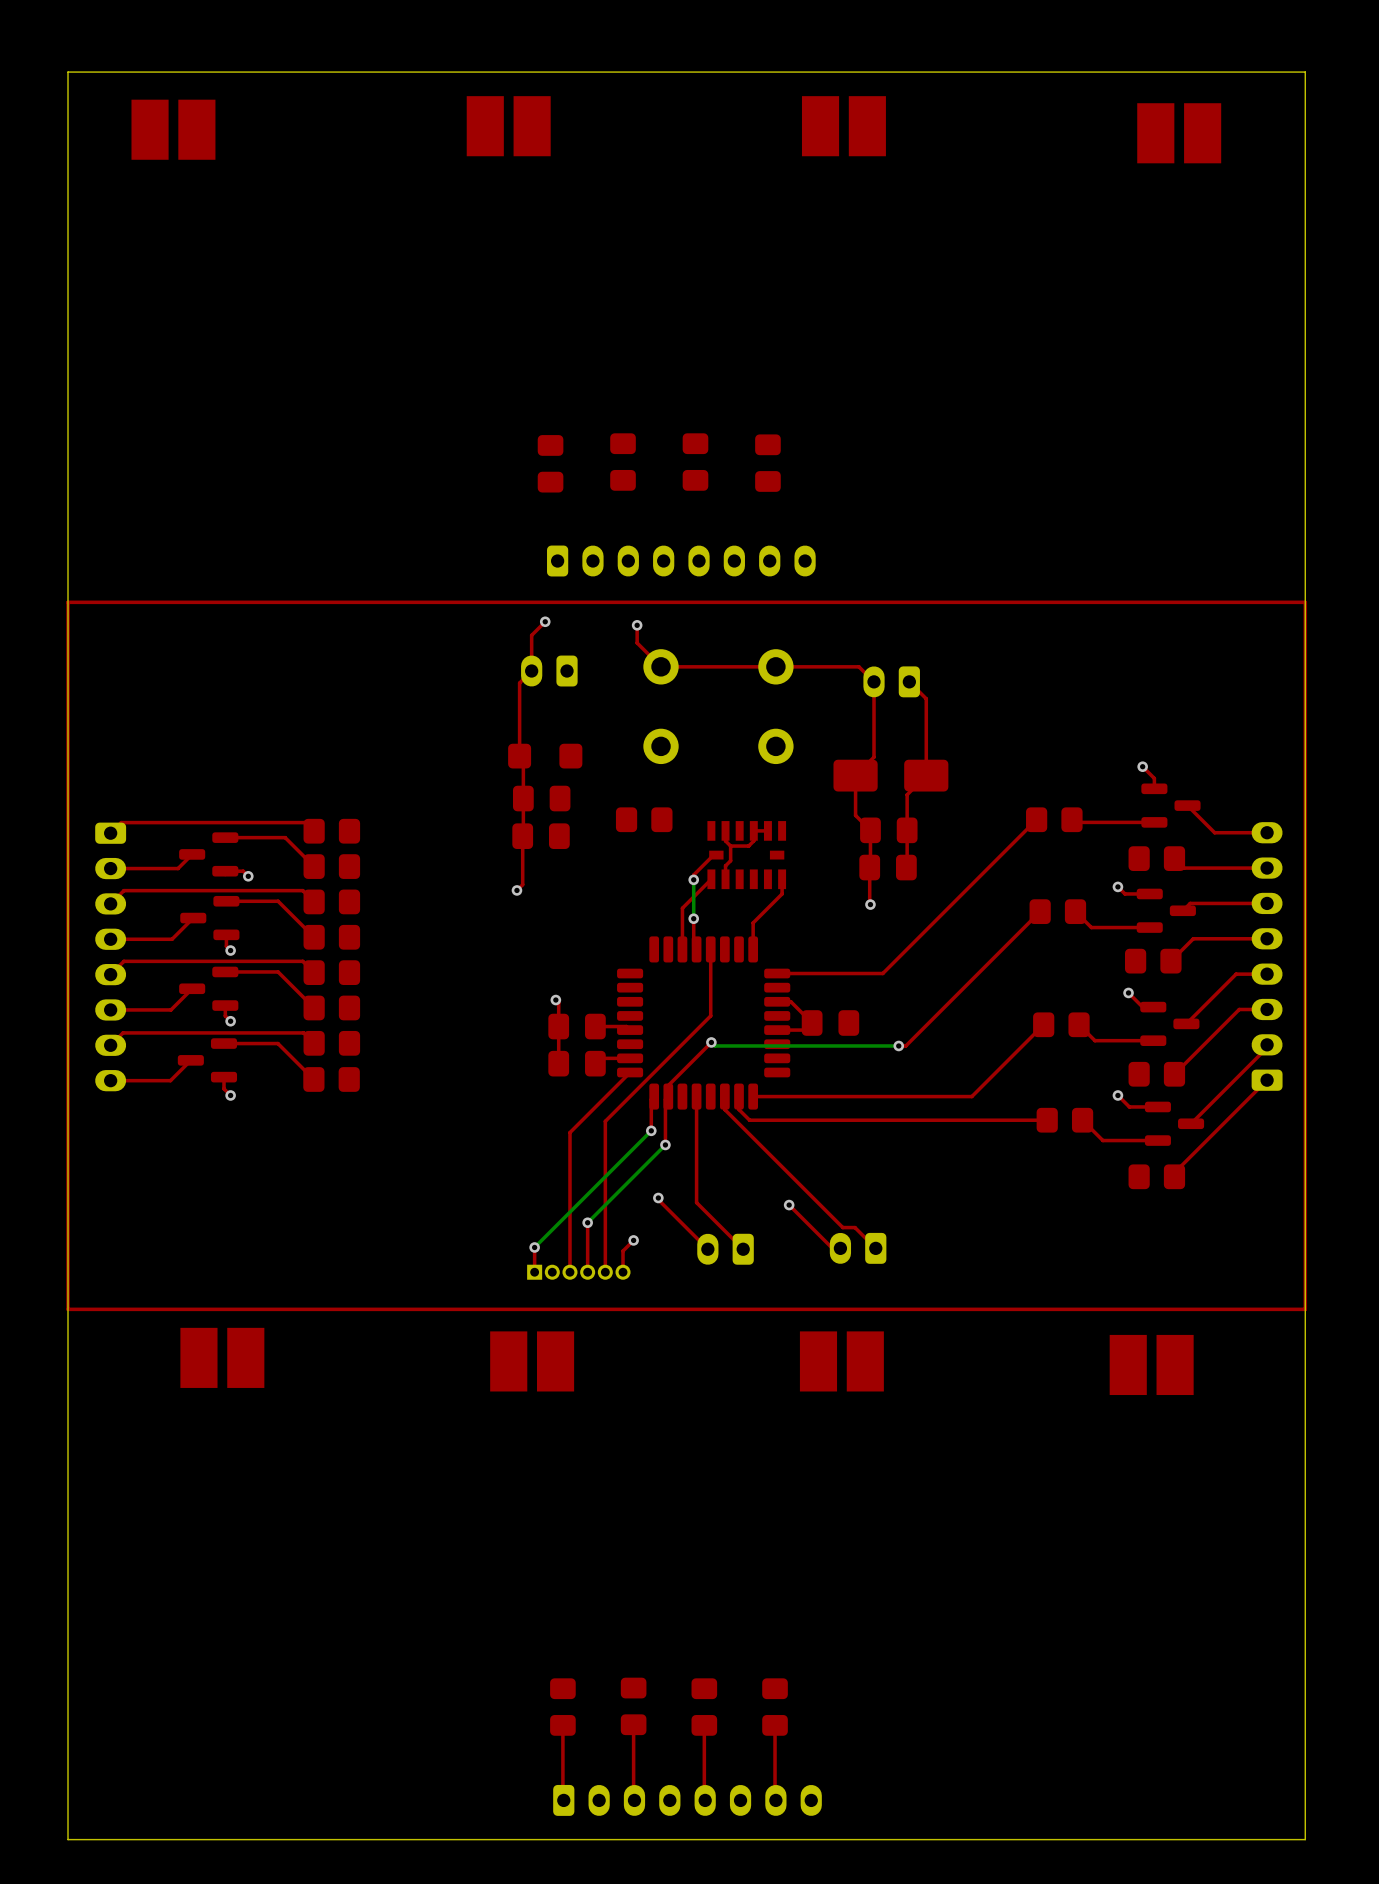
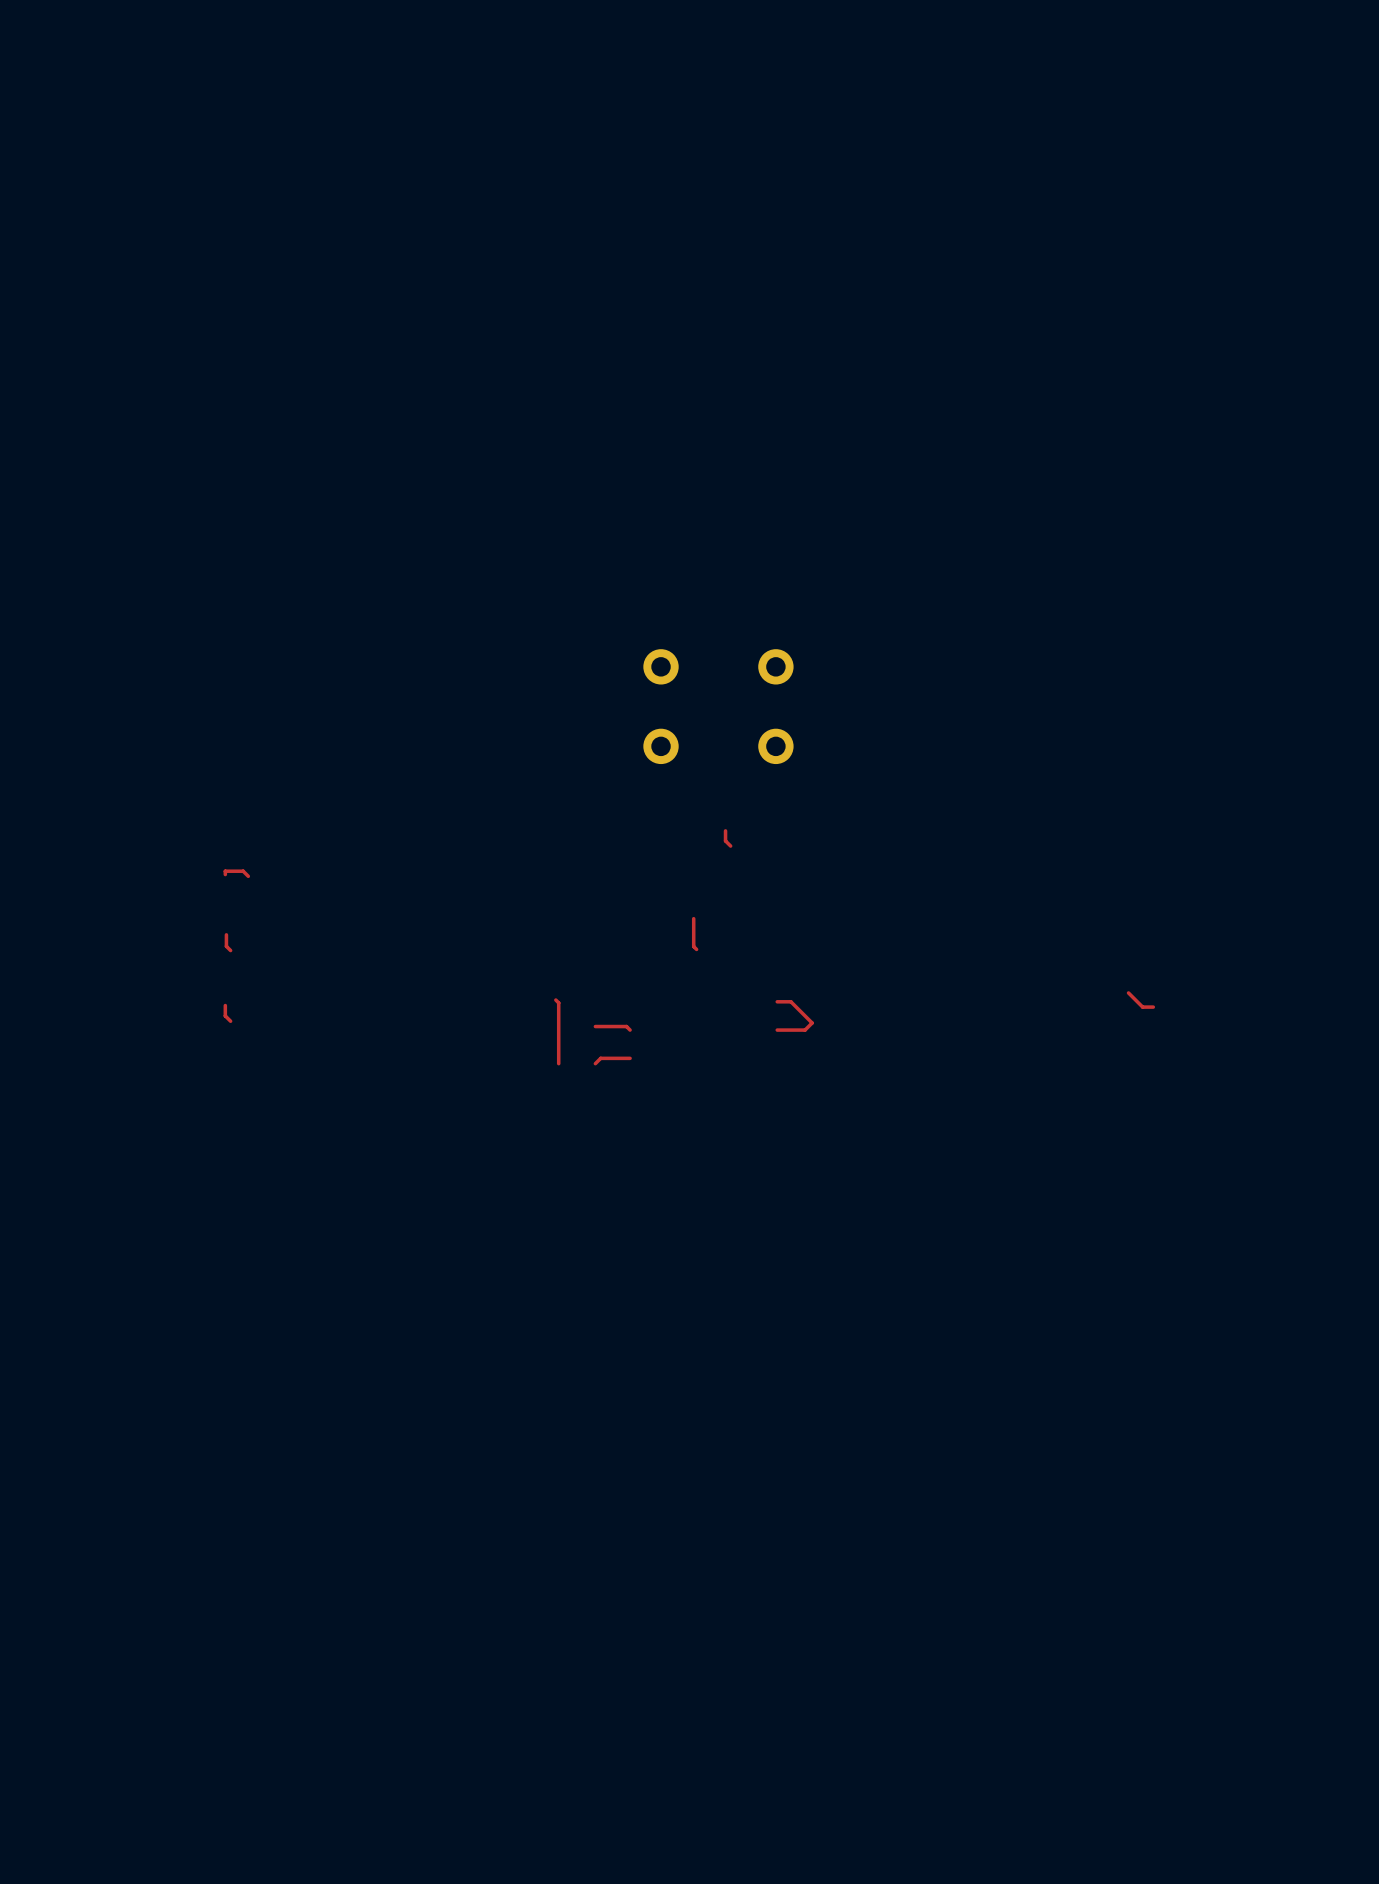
board edge: (1305, 72) (68, 72) (68, 1839) (1305, 1839) (1305, 72) -> none
part: (508, 126) -> none
part: (843, 126) -> none
part: (173, 129) -> none
part: (1179, 133) -> none
part: (623, 462) -> none
part: (695, 462) -> none
part: (550, 463) -> none
part: (767, 463) -> none
part: (681, 561) -> none
top track: (1305, 602) (68, 602) (68, 1309) (1305, 1309) (1305, 602) -> none
top track: (545, 621) (531, 635) (531, 671) (519, 683) (519, 756) (523, 759) (522, 884) (516, 890) -> none
via: (545, 621) -> none
top track: (637, 625) (637, 642) (661, 666) (858, 666) (874, 681) (874, 757) (855, 775) (855, 815) (870, 830) (870, 904) -> none
via: (637, 625) -> none
part: (549, 671) -> none
part: (891, 681) -> none
top track: (909, 681) (926, 698) (926, 775) (907, 794) (907, 866) -> none
part: (545, 756) -> none
top track: (1142, 766) (1154, 778) (1154, 788) -> none
via: (1142, 766) -> none
part: (890, 775) -> none
part: (541, 798) -> none
part: (1170, 805) -> none
top track: (1187, 805) (1214, 832) (1267, 832) -> none
part: (644, 819) -> none
top track: (1036, 819) (882, 973) (777, 973) -> none
part: (1054, 819) -> none
top track: (1071, 819) (1074, 822) (1154, 822) -> none
top track: (767, 830) (753, 830) (753, 840) (748, 846) (730, 846) (730, 860) (725, 865) (725, 879) -> none
part: (888, 830) -> none
top track: (314, 831) (305, 822) (121, 822) (110, 833) -> none
part: (331, 831) -> none
part: (541, 836) -> none
top track: (225, 837) (285, 837) (314, 866) -> none
top track: (192, 854) (178, 868) (110, 868) -> none
part: (208, 854) -> none
top track: (716, 855) (713, 855) (693, 874) (693, 879) -> none
part: (746, 855) -> none
part: (1156, 858) -> none
top track: (1174, 858) (1183, 868) (1267, 868) -> none
part: (331, 866) -> none
part: (888, 867) -> none
via: (248, 876) -> none
bottom track: (693, 879) (693, 918) -> none
via: (693, 879) -> none
top track: (711, 879) (682, 908) (682, 949) -> none
top track: (782, 879) (782, 893) (753, 922) (753, 949) -> none
top track: (1117, 886) (1125, 893) (1149, 893) -> none
via: (1117, 886) -> none
via: (516, 890) -> none
top track: (226, 901) (278, 901) (314, 937) -> none
top track: (314, 901) (302, 890) (123, 890) (110, 903) -> none
part: (331, 901) -> none
top track: (1267, 903) (1190, 903) (1182, 910) -> none
via: (870, 904) -> none
part: (1166, 910) -> none
top track: (1040, 911) (905, 1045) (898, 1045) -> none
part: (1057, 911) -> none
top track: (1075, 911) (1091, 927) (1149, 927) -> none
top track: (193, 918) (172, 939) (110, 939) -> none
part: (209, 918) -> none
via: (693, 918) -> none
part: (331, 937) -> none
top track: (1267, 938) (1193, 938) (1170, 961) -> none
top track: (710, 949) (710, 1015) (605, 1121) (605, 1272) -> none
via: (230, 950) -> none
part: (110, 956) -> none
part: (1267, 956) -> none
part: (1153, 961) -> none
top track: (225, 971) (278, 971) (314, 1007) -> none
top track: (314, 972) (302, 961) (123, 961) (110, 974) -> none
part: (331, 972) -> none
top track: (1267, 974) (1236, 974) (1186, 1023) -> none
top track: (192, 988) (170, 1009) (110, 1009) -> none
part: (208, 988) -> none
via: (1128, 992) -> none
via: (555, 1000) -> none
part: (331, 1007) -> none
top track: (1267, 1009) (1239, 1009) (1174, 1074) -> none
via: (230, 1021) -> none
part: (703, 1023) -> none
part: (830, 1023) -> none
part: (1169, 1023) -> none
top track: (1043, 1024) (971, 1096) (753, 1096) -> none
part: (1061, 1024) -> none
top track: (1079, 1024) (1094, 1040) (1153, 1040) -> none
part: (577, 1026) -> none
top track: (711, 1042) (668, 1085) (668, 1096) (665, 1099) (665, 1144) -> none
bottom track: (711, 1042) (714, 1045) (898, 1045) -> none
via: (711, 1042) -> none
top track: (223, 1043) (277, 1043) (313, 1079) -> none
top track: (314, 1043) (303, 1032) (123, 1032) (110, 1045) -> none
part: (331, 1043) -> none
top track: (1267, 1044) (1267, 1047) (1191, 1123) -> none
via: (898, 1045) -> none
top track: (190, 1060) (170, 1080) (110, 1080) -> none
part: (207, 1060) -> none
part: (577, 1063) -> none
top track: (630, 1072) (569, 1132) (569, 1272) -> none
part: (1156, 1074) -> none
top track: (223, 1077) (223, 1088) (230, 1095) -> none
part: (331, 1079) -> none
top track: (1267, 1080) (1174, 1172) (1174, 1176) -> none
via: (230, 1095) -> none
top track: (1117, 1095) (1129, 1106) (1157, 1106) -> none
via: (1117, 1095) -> none
top track: (654, 1096) (651, 1099) (651, 1130) -> none
top track: (696, 1096) (696, 1202) (743, 1249) -> none
top track: (724, 1096) (724, 1109) (842, 1227) (854, 1227) (875, 1248) -> none
top track: (739, 1096) (739, 1109) (749, 1120) (1047, 1120) -> none
part: (1064, 1120) -> none
top track: (1082, 1120) (1102, 1140) (1157, 1140) -> none
part: (1174, 1123) -> none
bottom track: (651, 1130) (534, 1247) -> none
via: (651, 1130) -> none
bottom track: (665, 1144) (587, 1222) -> none
via: (665, 1144) -> none
part: (1156, 1176) -> none
top track: (658, 1197) (707, 1249) -> none
via: (658, 1197) -> none
top track: (789, 1205) (832, 1248) (840, 1248) -> none
via: (789, 1205) -> none
top track: (587, 1222) (587, 1272) -> none
via: (587, 1222) -> none
top track: (633, 1240) (623, 1251) (623, 1272) -> none
via: (633, 1240) -> none
top track: (534, 1247) (534, 1272) -> none
via: (534, 1247) -> none
part: (858, 1248) -> none
part: (725, 1249) -> none
part: (578, 1272) -> none
part: (222, 1357) -> none
part: (532, 1361) -> none
part: (841, 1361) -> none
part: (1151, 1364) -> none
part: (633, 1706) -> none
part: (562, 1707) -> none
part: (704, 1707) -> none
part: (775, 1707) -> none
top track: (633, 1724) (634, 1800) -> none
top track: (562, 1725) (563, 1800) -> none
top track: (704, 1725) (705, 1800) -> none
top track: (775, 1725) (775, 1800) -> none
part: (687, 1800) -> none

